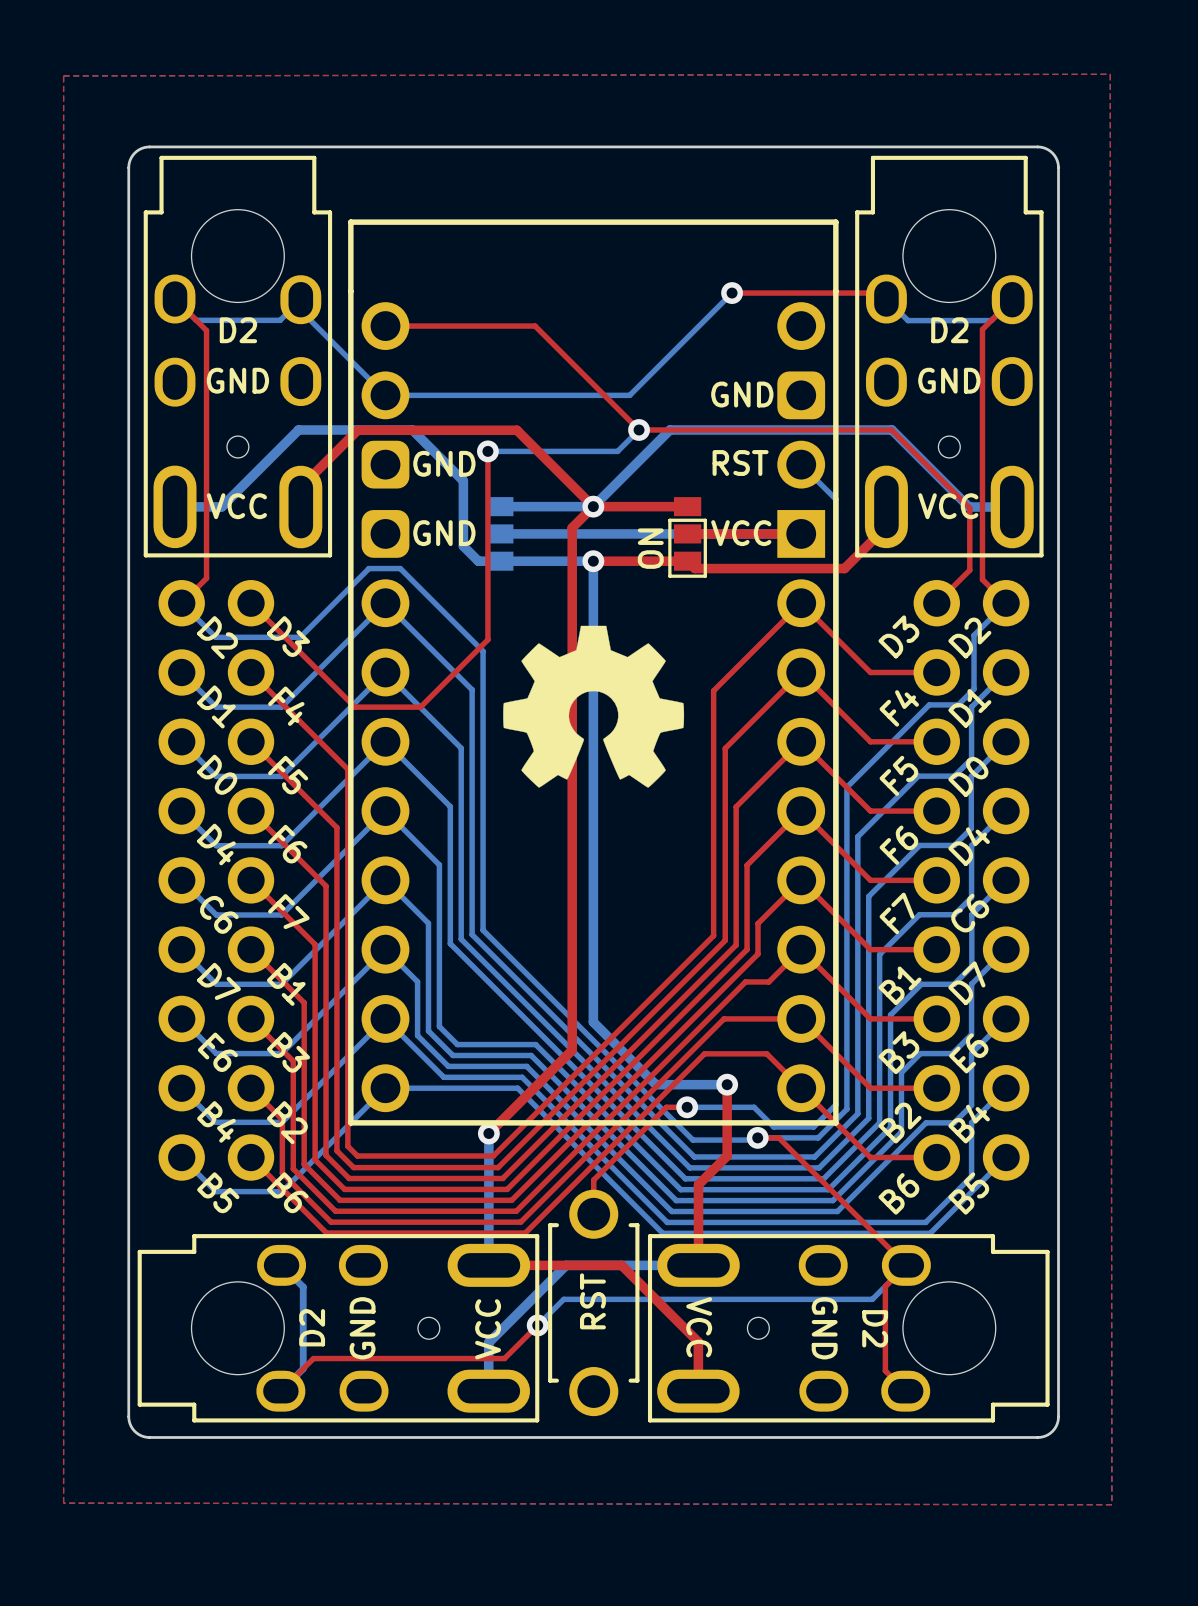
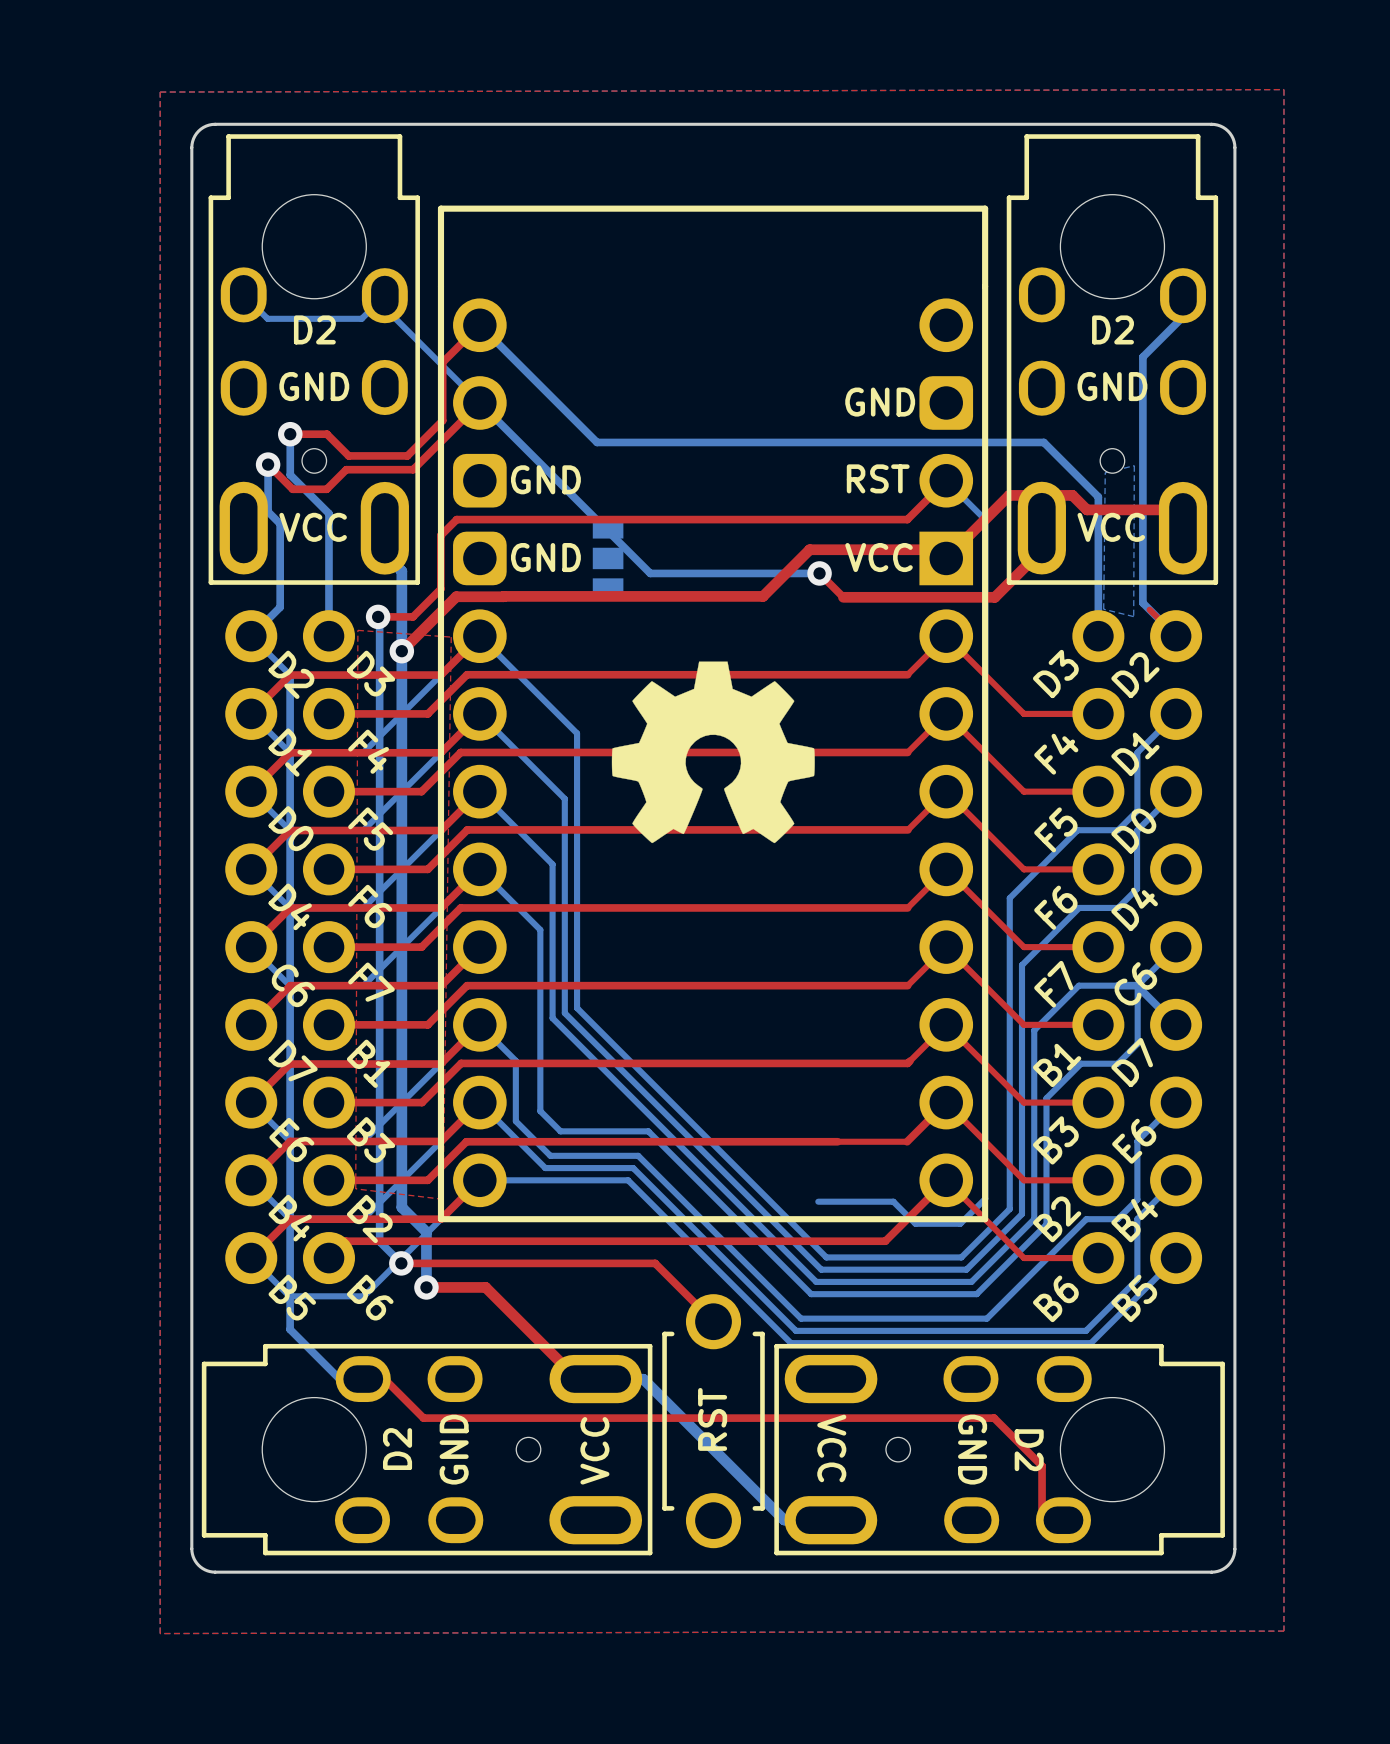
top zone outline: (1110, 74) (63, 75) (63, 1503) (1111, 1504) (1110, 74) -> (1283, 89) (160, 92) (160, 1633) (1283, 1631) (1283, 89)
bottom track: (732, 293) (629, 395) (385, 395) -> (819, 573) (650, 573) (479, 402)
top track: (732, 293) (880, 293) (886, 299) -> none
via: (732, 293) -> none
top track: (175, 299) (206, 330) (206, 578) (181, 603) -> none
bottom track: (886, 299) (908, 320) (991, 320) (1012, 299) -> none
top track: (1012, 299) (982, 329) (982, 579) -> none
bottom track: none -> (479, 325) (597, 442) (1043, 442) (1098, 496) (1098, 636)
top track: (385, 326) (535, 326) (639, 429) (891, 429) (969, 508) (969, 570) (936, 603) -> (479, 325) (442, 362) (442, 420) (407, 455) (348, 455) (326, 434) (290, 434)
top track: none -> (479, 402) (413, 469) (346, 469) (326, 489) (292, 489) (268, 464)
bottom track: none -> (290, 434) (290, 474) (328, 513) (328, 636)
via: none -> (290, 434)
bottom track: (639, 429) (617, 451) (487, 451) -> none
via: (639, 429) -> none
bottom track: none -> (268, 464) (268, 511) (280, 523) (280, 607) (251, 636)
via: none -> (268, 464)
top track: (487, 451) (487, 639) (420, 707) (354, 707) (251, 603) -> none
via: (487, 451) -> none
bottom zone outline: none -> (1134, 465) (1105, 472) (1103, 609) (1133, 616) (1134, 465)
top track: none -> (946, 480) (907, 519) (456, 519) (440, 535) (440, 589) (412, 616) (378, 616)
bottom track: none -> (384, 509) (384, 554) (401, 571) (401, 1207) (426, 1232) (426, 1287)
top track: none -> (1182, 509) (1086, 509) (1072, 495) (1009, 495) (946, 558) (937, 549) (809, 549) (763, 596) (503, 596)
bottom track: (175, 506) (221, 506) (298, 429) (412, 429) (463, 481) (463, 546) (478, 561) (593, 561) (593, 1022) (655, 1084) (727, 1084) -> none
bottom track: (499, 506) (593, 506) (670, 429) (891, 429) (968, 507) (1012, 507) -> none
top track: (593, 506) (572, 527) (572, 1050) (488, 1133) -> none
top track: (593, 506) (516, 430) (357, 430) (300, 487) (300, 507) -> none
top track: (593, 506) (687, 506) -> none
via: (593, 506) -> none
bottom track: (499, 533) (801, 533) -> none
top track: (687, 533) (801, 533) -> none
ON: (687, 537) -> none
via: none -> (819, 573)
top track: (593, 561) (687, 561) (694, 568) (709, 568) -> (819, 573) (843, 597)
via: (593, 561) -> none
top track: none -> (503, 596) (456, 596) (401, 651)
bottom track: none -> (378, 616) (379, 618) (379, 1241) (401, 1263)
via: none -> (378, 616)
top zone outline: none -> (357, 630) (451, 637) (442, 1199) (355, 1188) (357, 630)
top track: none -> (479, 636) (440, 675) (290, 675) (251, 713)
bottom track: (1006, 603) (974, 635) (974, 689) (958, 704) (929, 704) (846, 787) (846, 1109) (818, 1137) (692, 1140) (483, 930) (483, 651) (400, 568) (368, 568) (300, 637) (215, 637) -> (1176, 636) (1142, 602) (1142, 357) (1182, 317)
via: none -> (401, 651)
bottom track: none -> (289, 674) (290, 1329) (339, 1379) (384, 1379)
top track: (766, 637) (713, 690) (713, 935) (493, 1156) (357, 1156) (347, 1146) (347, 769) (251, 672) -> (907, 674) (467, 674) (427, 713) (328, 713)
top track: none -> (479, 713) (440, 752) (290, 752) (251, 791)
top track: (766, 706) (725, 748) (725, 940) (498, 1167) (353, 1167) (336, 1150) (336, 827) (251, 741) -> (907, 752) (460, 752) (421, 791) (328, 791)
top track: none -> (479, 791) (440, 830) (290, 830) (251, 869)
top track: (767, 775) (736, 806) (736, 945) (502, 1178) (349, 1178) (326, 1155) (326, 886) (251, 811) -> (908, 829) (467, 829) (427, 869) (328, 869)
top track: none -> (479, 869) (441, 907) (290, 907) (251, 947)
bottom track: (1006, 811) (971, 845) (971, 897) (954, 914) -> (1176, 1024) (1136, 985) (1118, 985)
top track: (766, 845) (747, 865) (747, 949) (507, 1189) (344, 1189) (315, 1159) (315, 944) (251, 880) -> (907, 907) (460, 907) (421, 947) (328, 947)
top track: none -> (479, 947) (441, 985) (290, 985) (251, 1024)
top track: (766, 914) (757, 923) (757, 954) (511, 1200) (340, 1200) (304, 1164) (304, 1002) (251, 949) -> (907, 985) (467, 985) (427, 1024) (328, 1024)
bottom track: (181, 949) (216, 984) (281, 984) (385, 880) (428, 923) (428, 1031) (452, 1055) (531, 1055) (676, 1200) (832, 1200) (901, 1132) (901, 1072) (920, 1053) (952, 1053) (971, 1034) (971, 984) (1006, 949) -> none
top track: none -> (479, 1024) (440, 1064) (289, 1064) (251, 1102)
top track: (768, 981) (745, 981) (516, 1211) (335, 1211) (293, 1168) (293, 1061) (251, 1018) -> (909, 1061) (907, 1063) (461, 1063) (422, 1102) (328, 1102)
top track: none -> (479, 1102) (440, 1141) (290, 1141) (251, 1180)
top track: (801, 1018) (724, 1018) (520, 1222) (331, 1222) (282, 1173) (282, 1119) (251, 1088) -> none
top track: (704, 1053) (525, 1233) (326, 1233) (251, 1157) -> (837, 1141) (466, 1141) (427, 1180) (328, 1180)
top track: (766, 1053) (801, 1088) -> (907, 1141) (946, 1102)
top track: (727, 1084) (727, 1156) (698, 1184) (698, 1265) -> none
via: (727, 1084) -> none
top track: none -> (479, 1180) (440, 1219) (290, 1219) (251, 1258)
top track: none -> (946, 1180) (885, 1241) (345, 1241) (328, 1258)
top track: (687, 1107) (666, 1107) (593, 1180) (593, 1214) -> (401, 1263) (655, 1263) (713, 1321)
via: (687, 1107) -> none
bottom track: (488, 1133) (488, 1265) -> none
via: (488, 1133) -> none
top track: (757, 1137) (778, 1137) (906, 1265) (885, 1286) (885, 1370) (905, 1391) -> none
via: (757, 1137) -> none
via: none -> (401, 1263)
top track: none -> (426, 1287) (485, 1287) (577, 1379)
via: none -> (426, 1287)
bottom track: (281, 1265) (303, 1287) (303, 1368) (280, 1391) -> none
top track: none -> (384, 1379) (423, 1418) (994, 1418) (1042, 1466) (1042, 1520)
bottom track: none -> (577, 1379) (643, 1379) (784, 1520) (849, 1520)
top track: (488, 1265) (621, 1265) (698, 1342) (698, 1391) -> none
bottom track: (698, 1265) (566, 1265) (488, 1342) (488, 1391) -> none
bottom track: (906, 1265) (872, 1299) (563, 1299) (537, 1325) -> none
top track: (537, 1325) (504, 1358) (313, 1358) (280, 1391) -> none
via: (537, 1325) -> none

